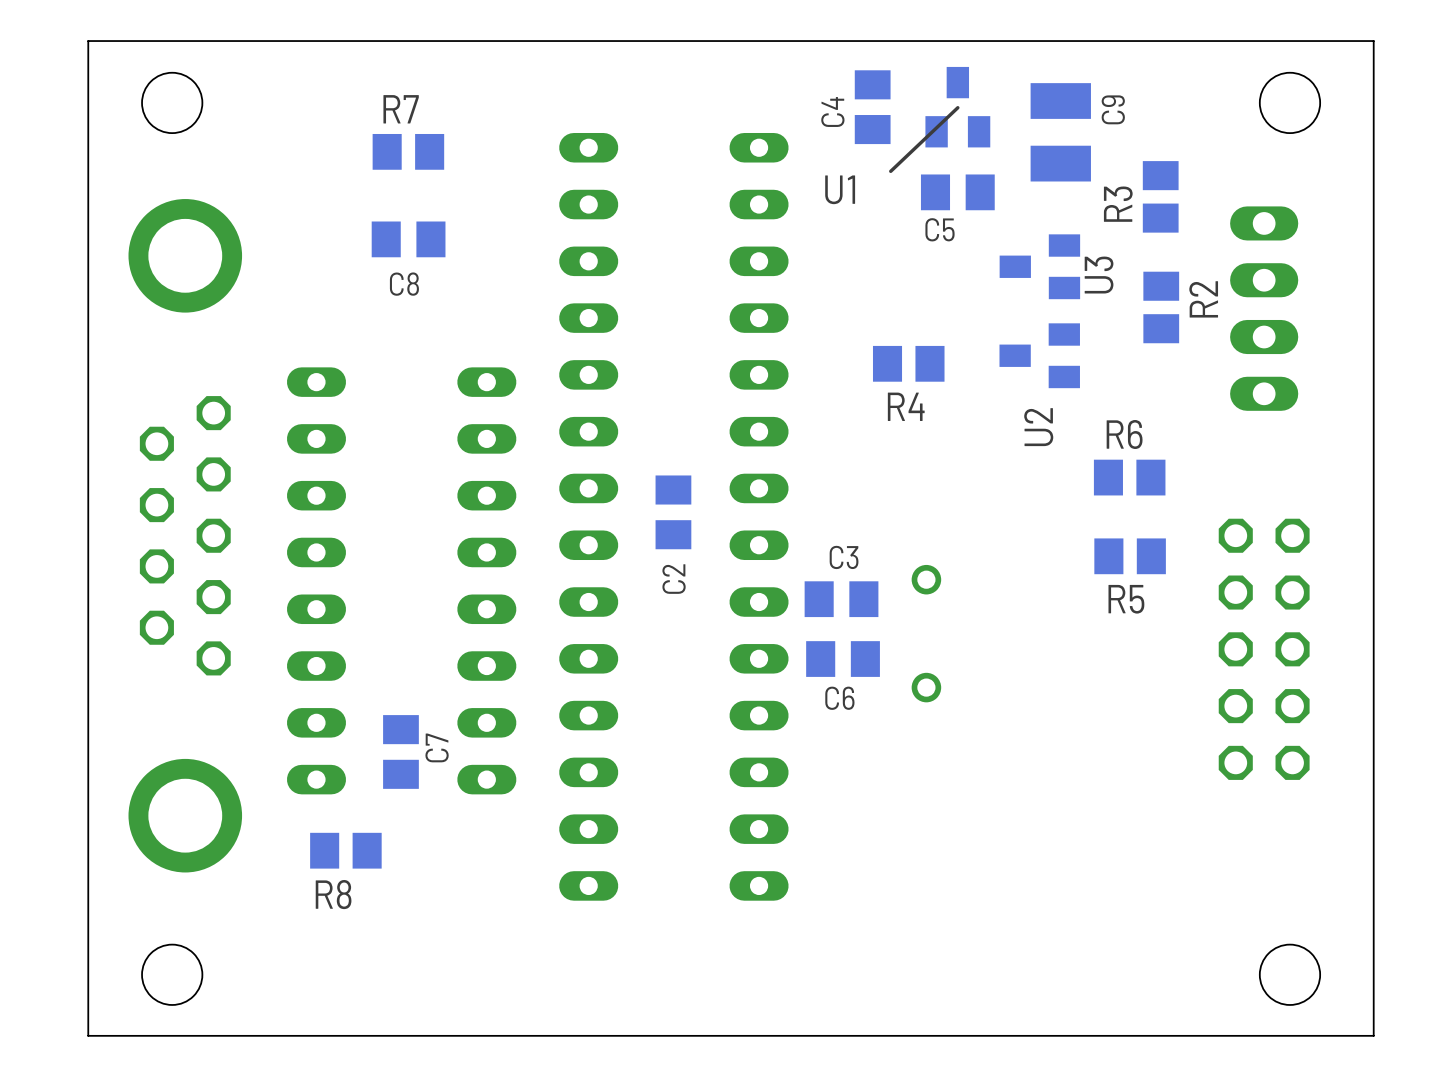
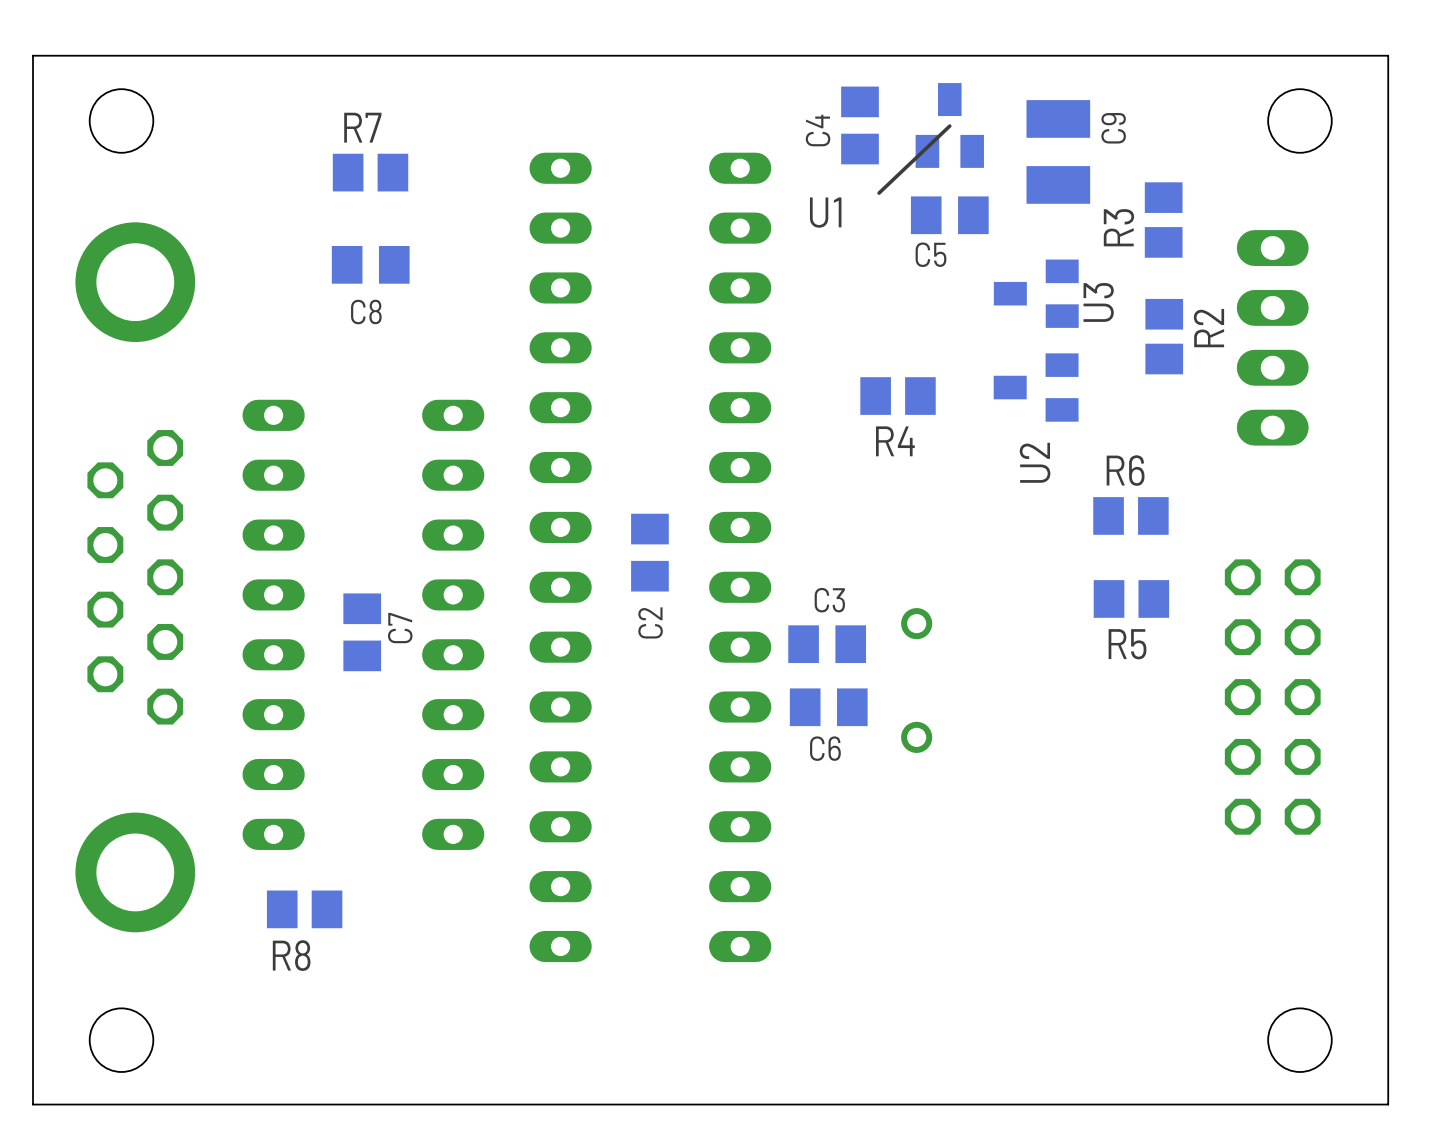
C7 position: (400, 751) -> (362, 632)

